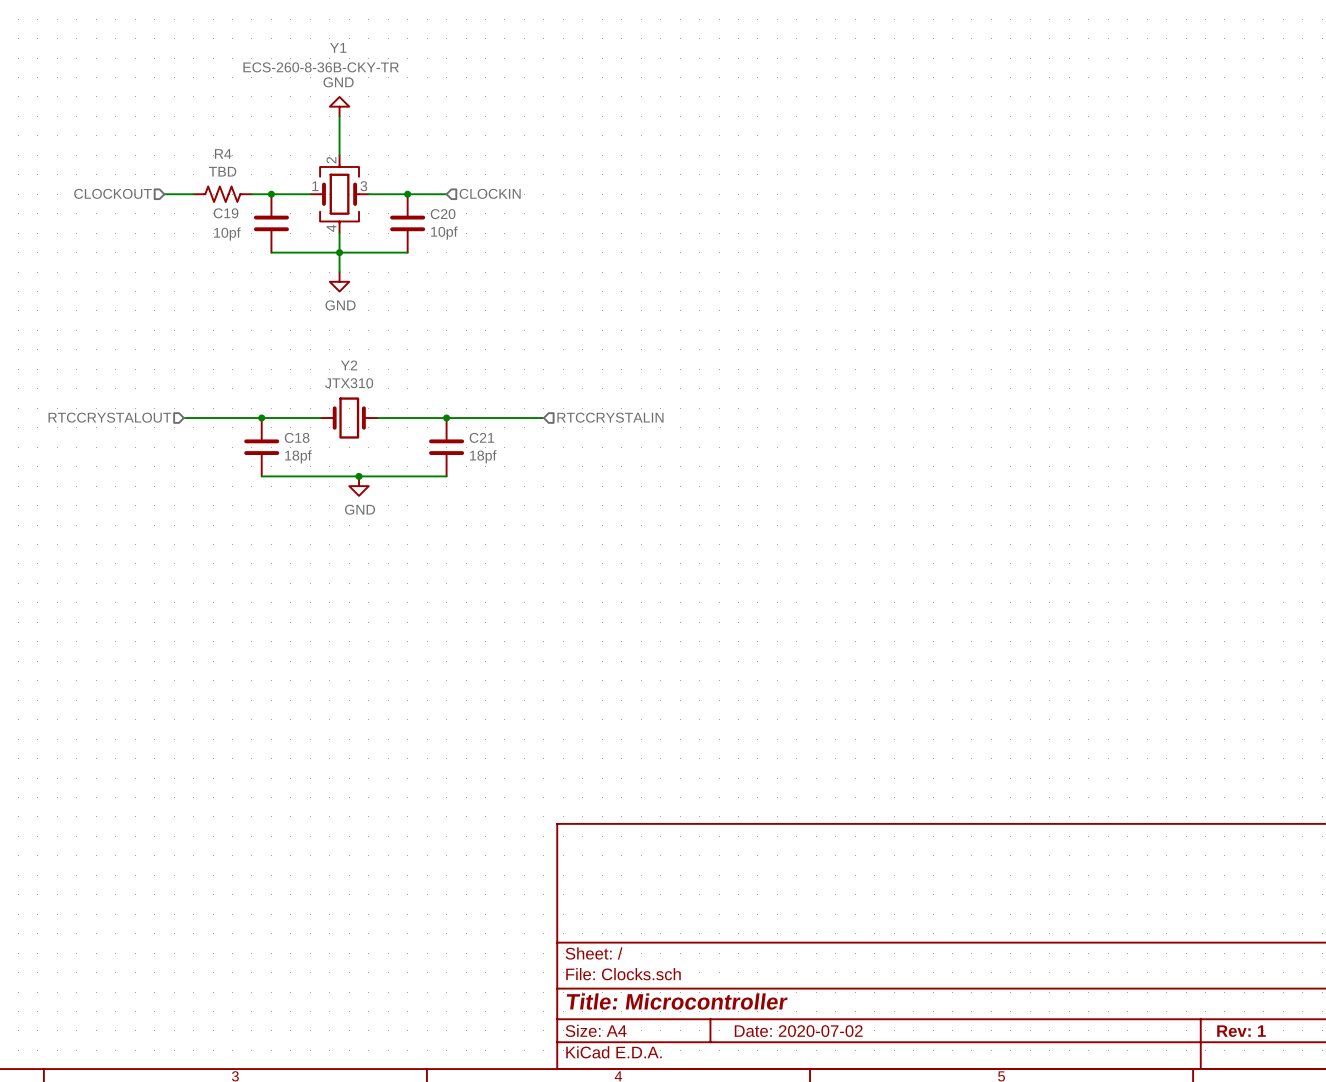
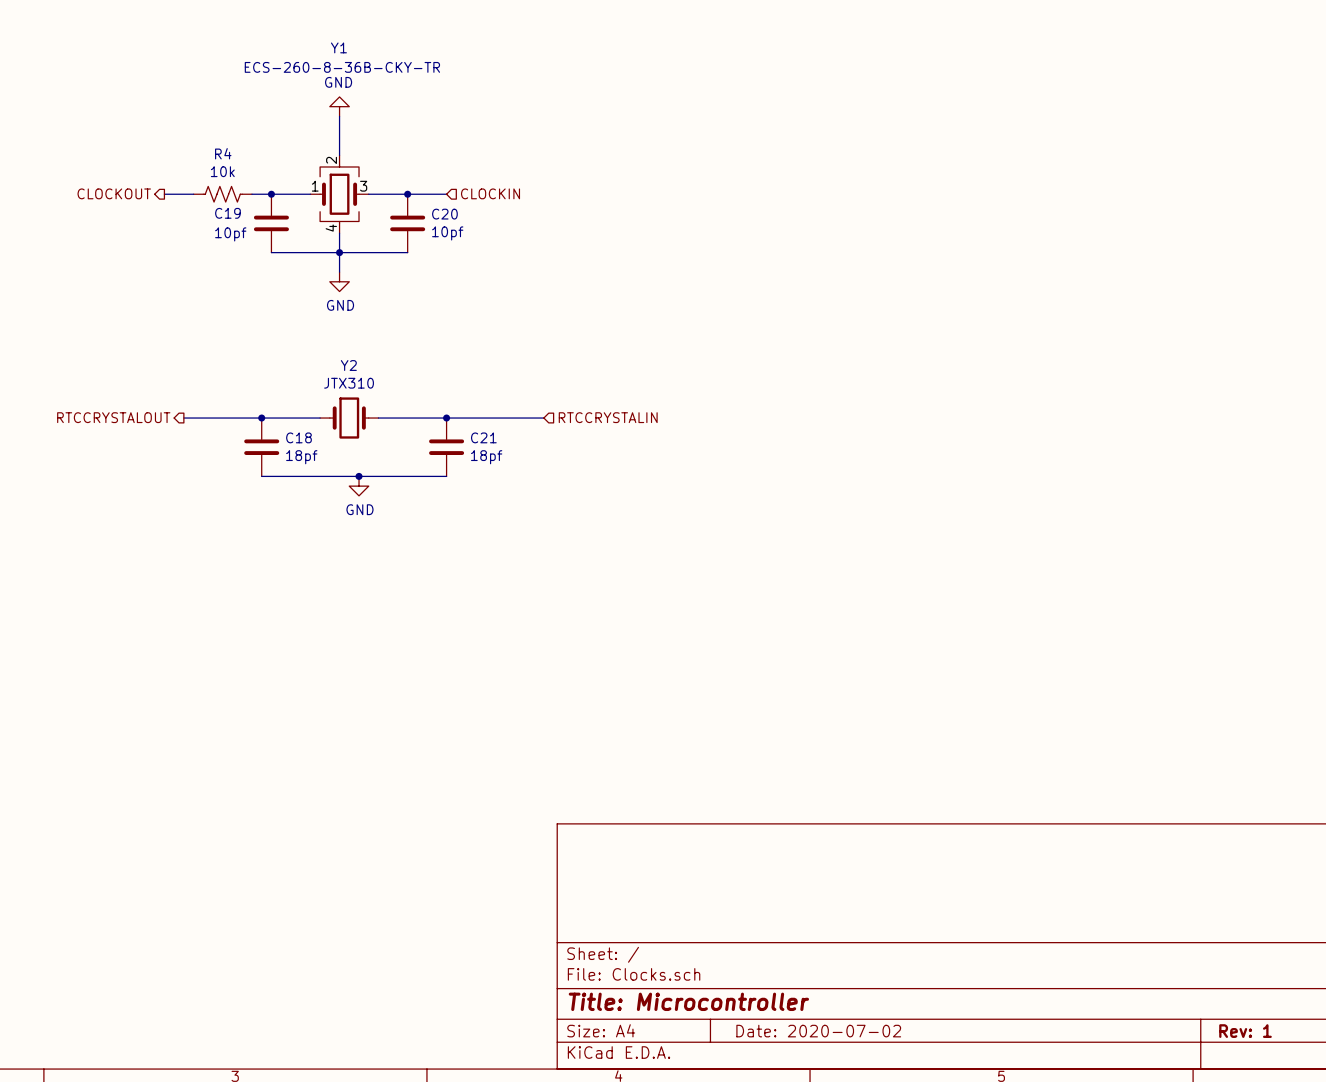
R4 value: TBD (222, 171) -> 10k (222, 171)
hierarchical label shape: input (112, 193) -> output (114, 193)
hierarchical label shape: input (109, 417) -> output (113, 417)

